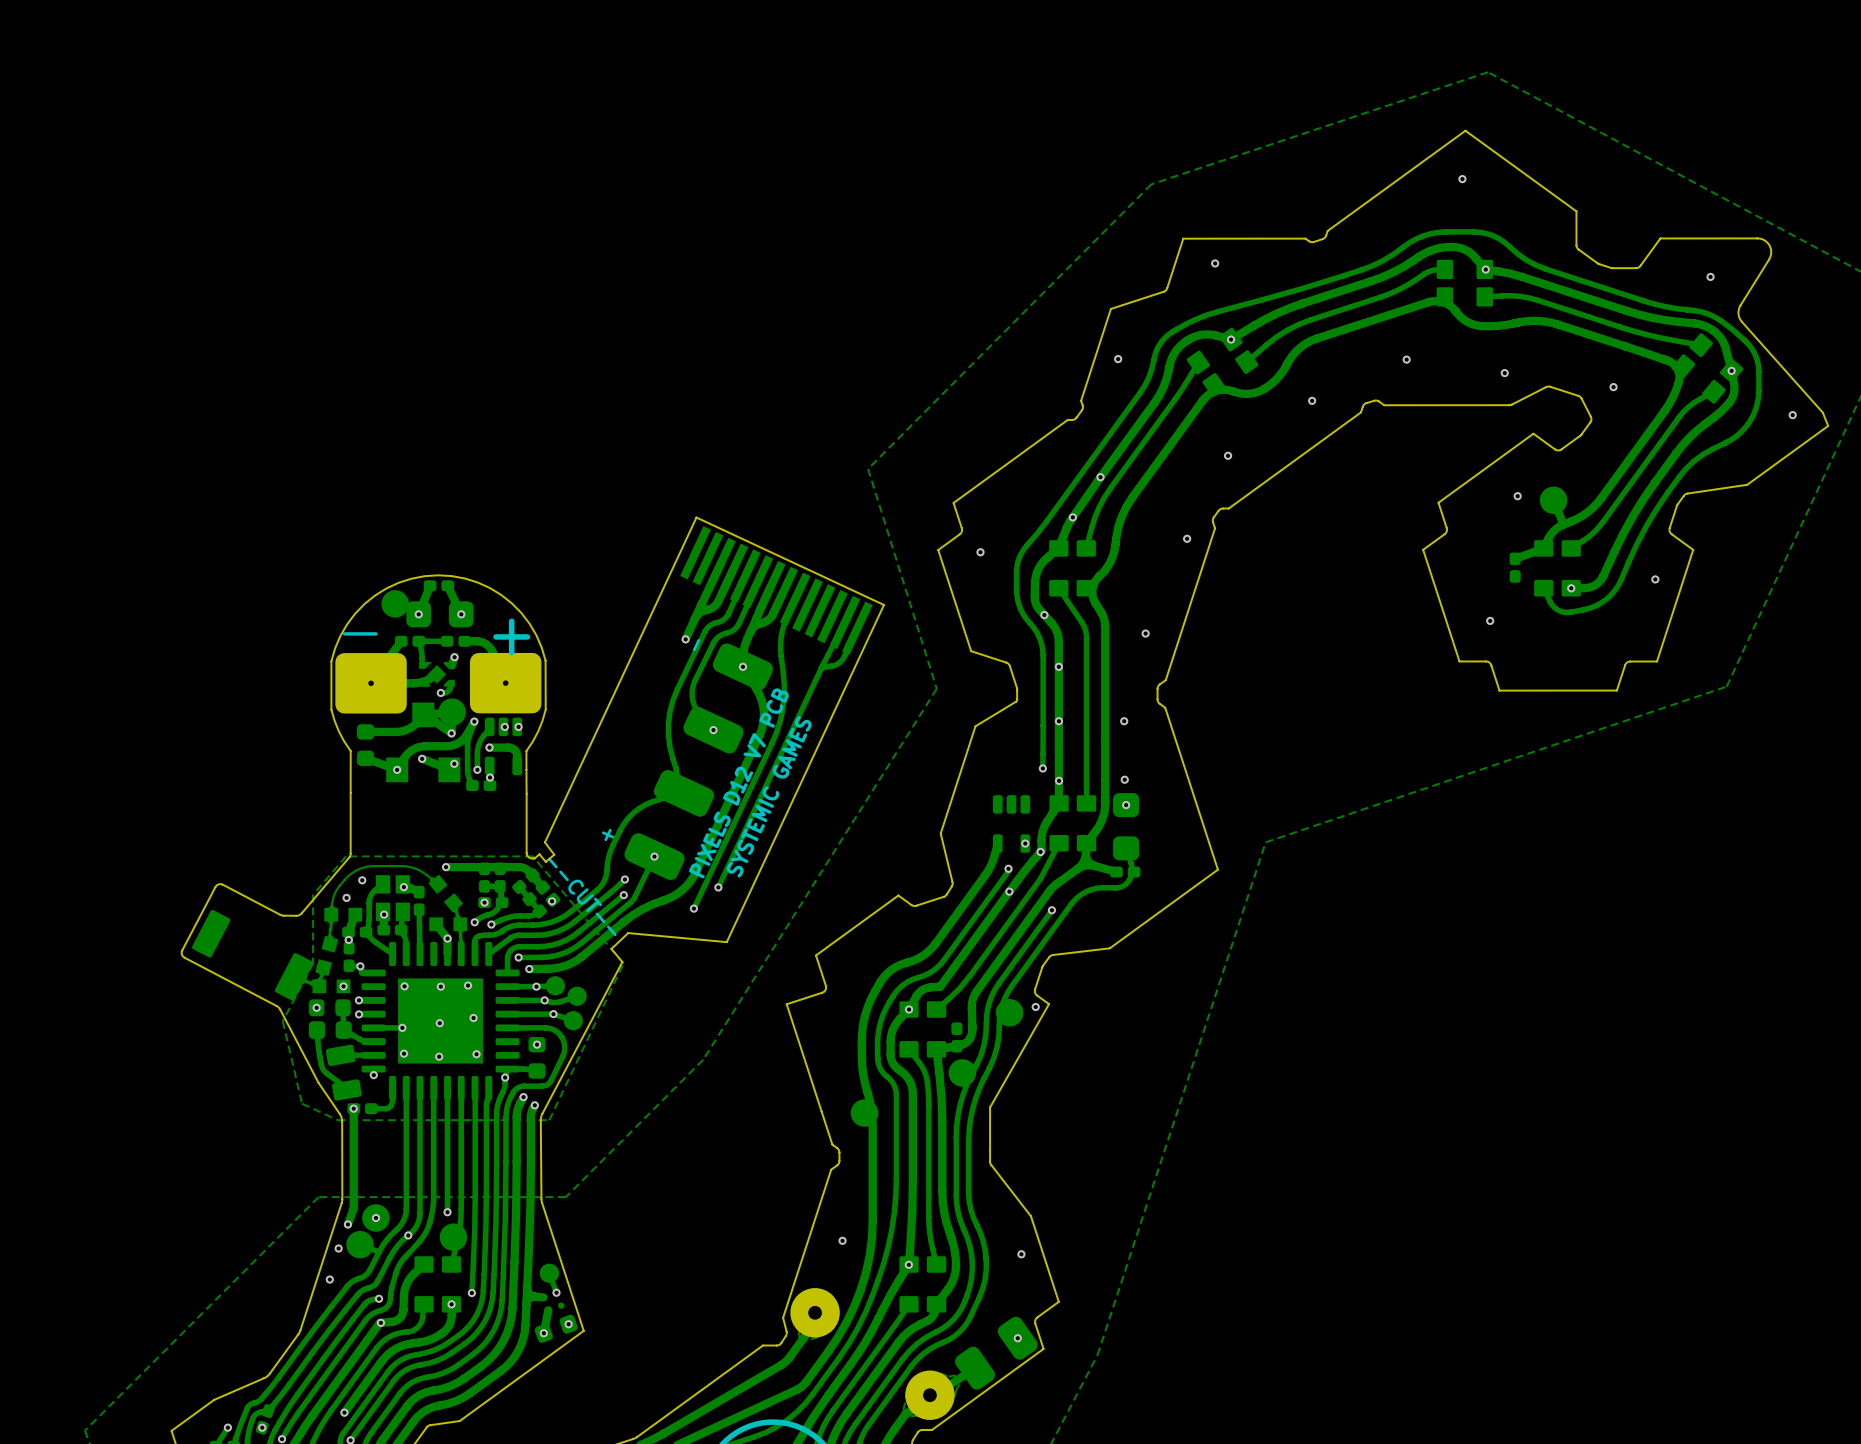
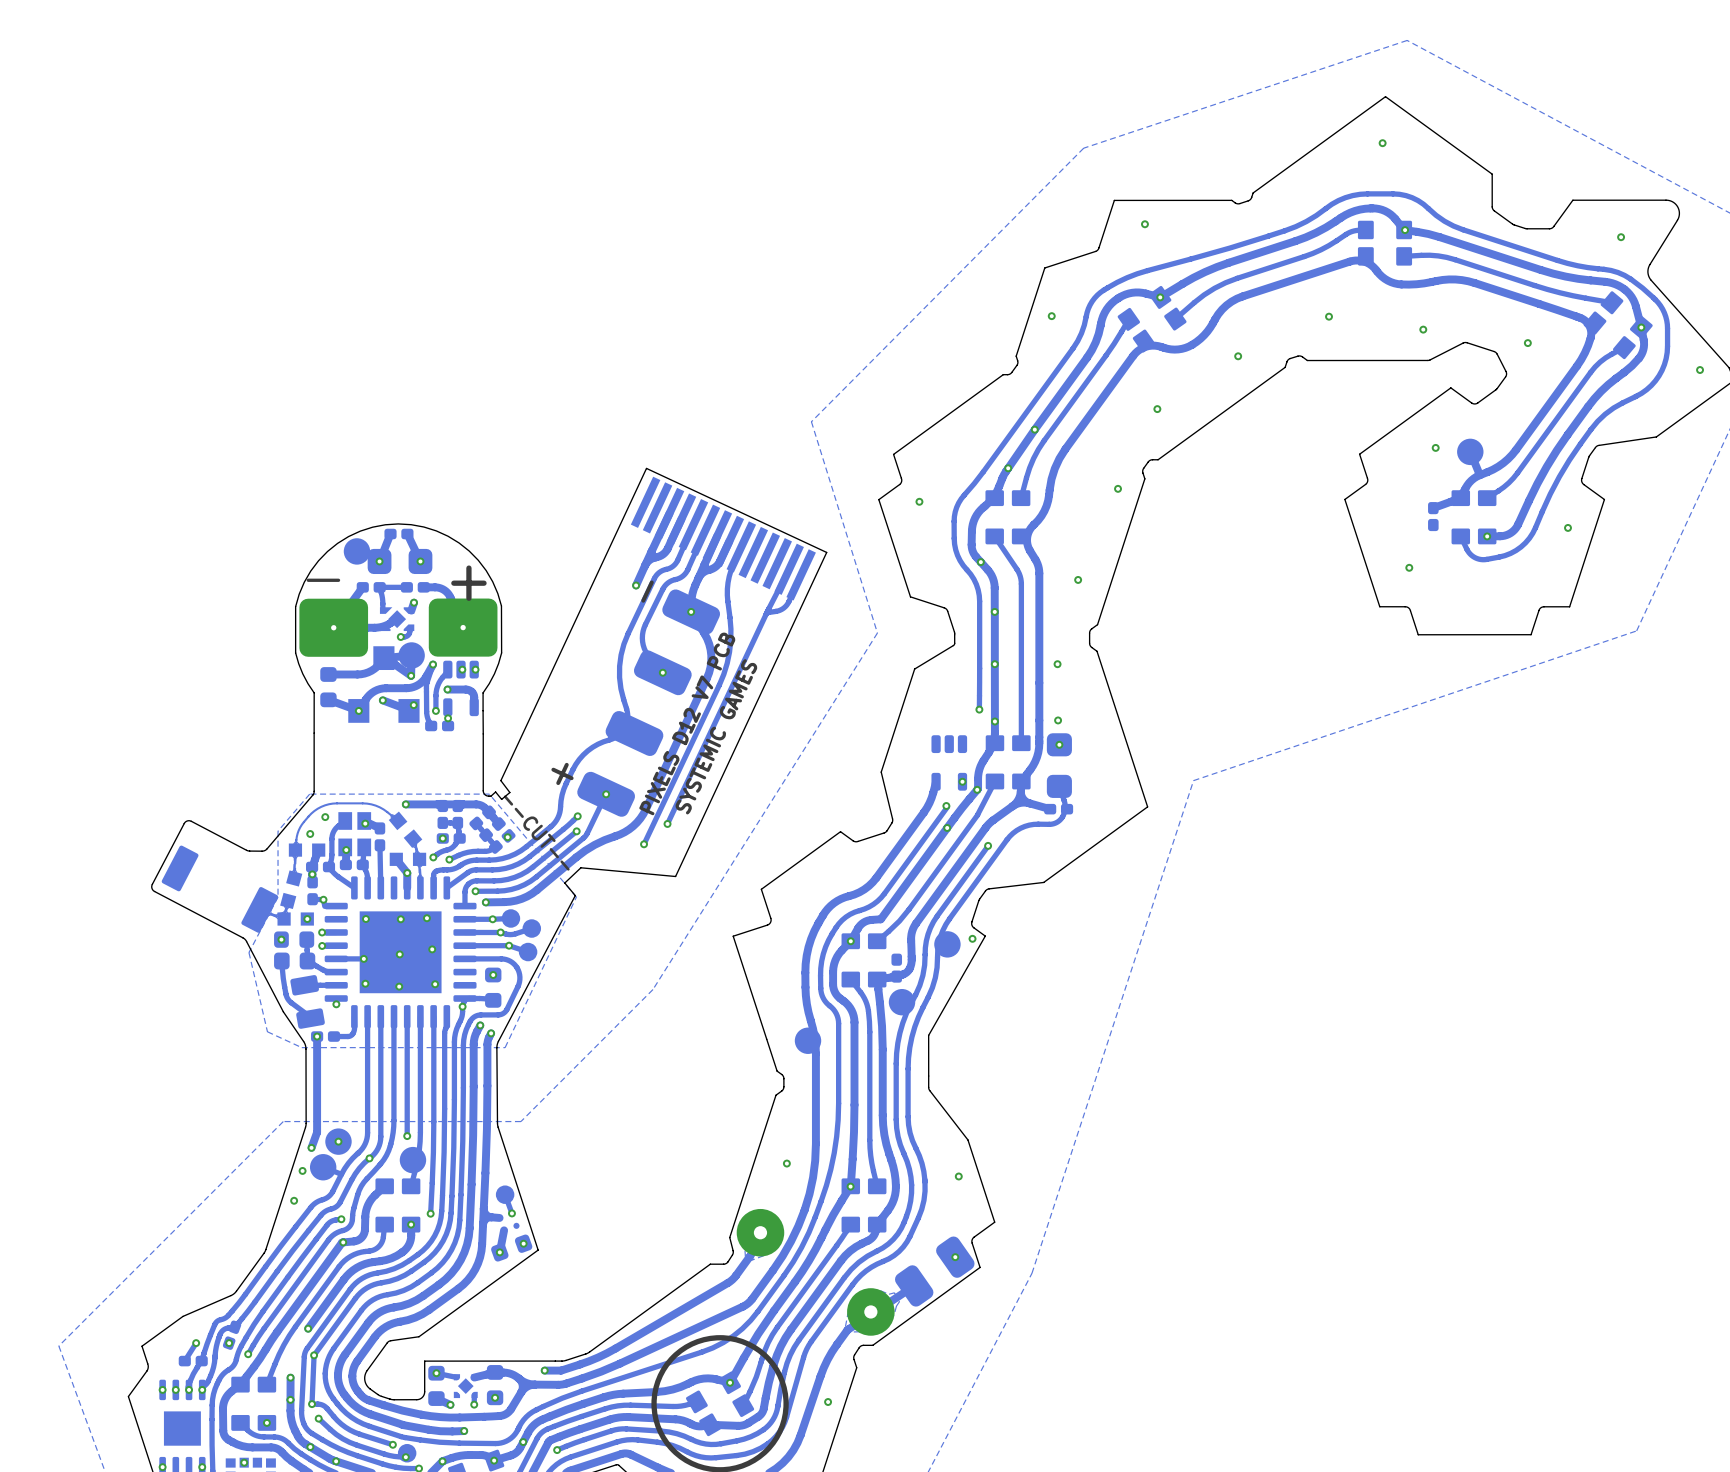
part footprint: [624, 643, 774, 881] -> [577, 589, 721, 817]

